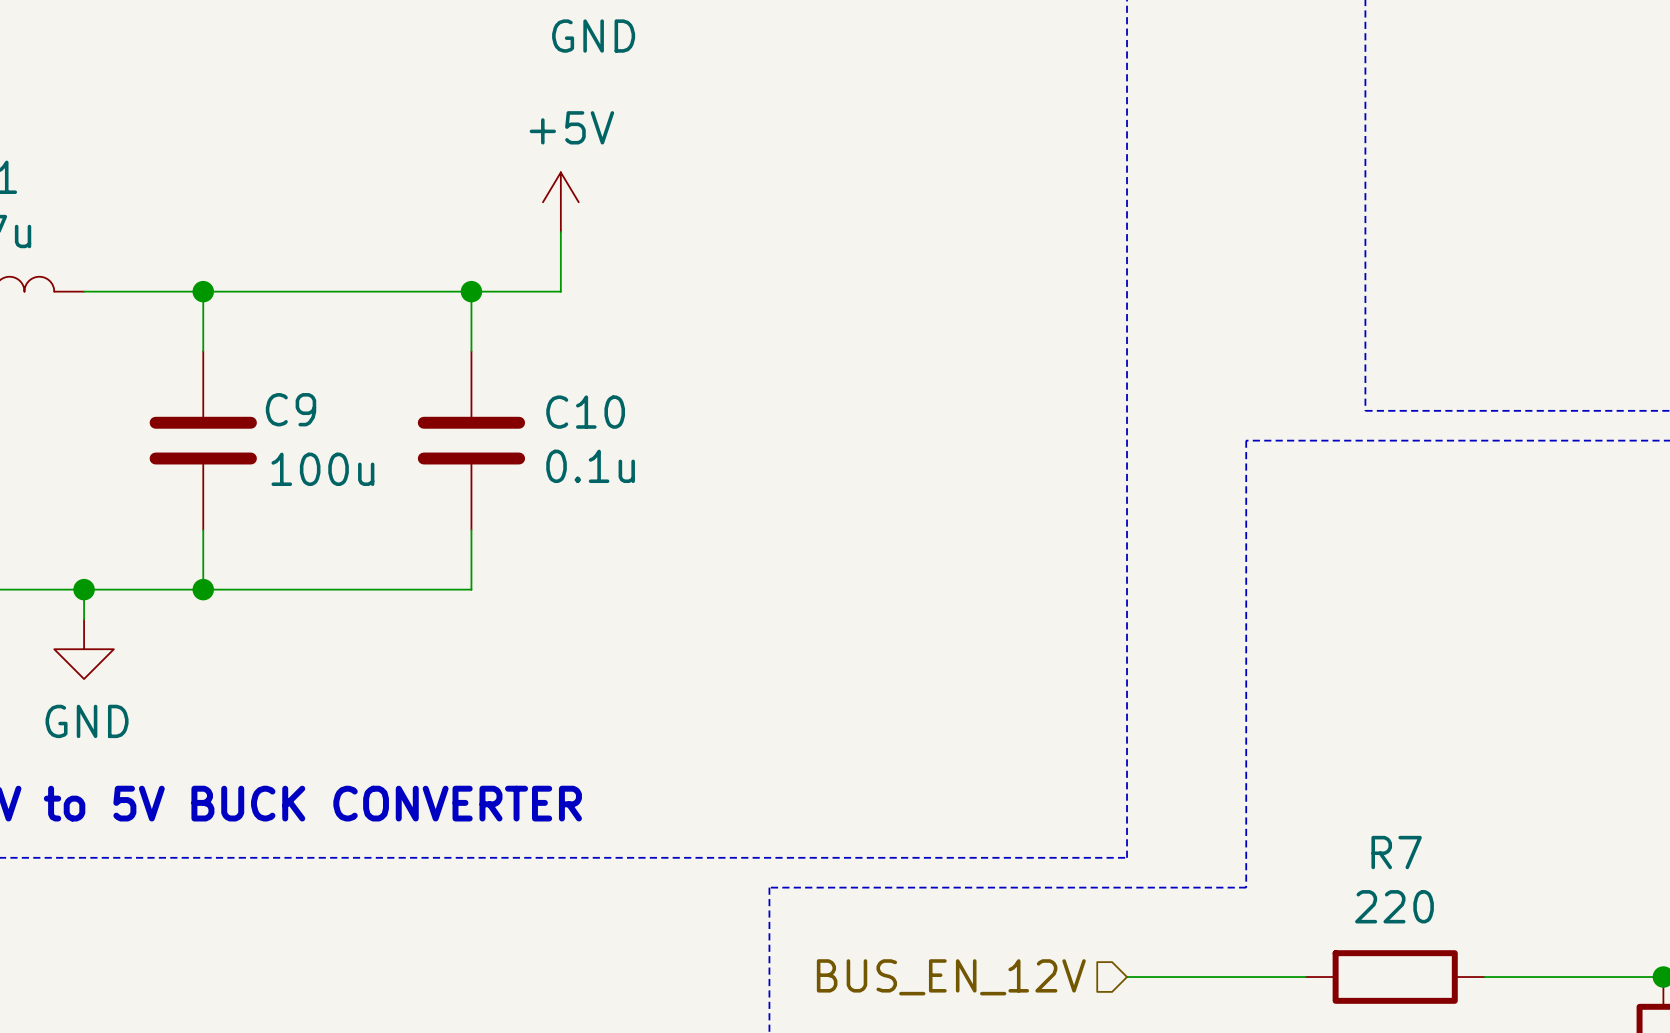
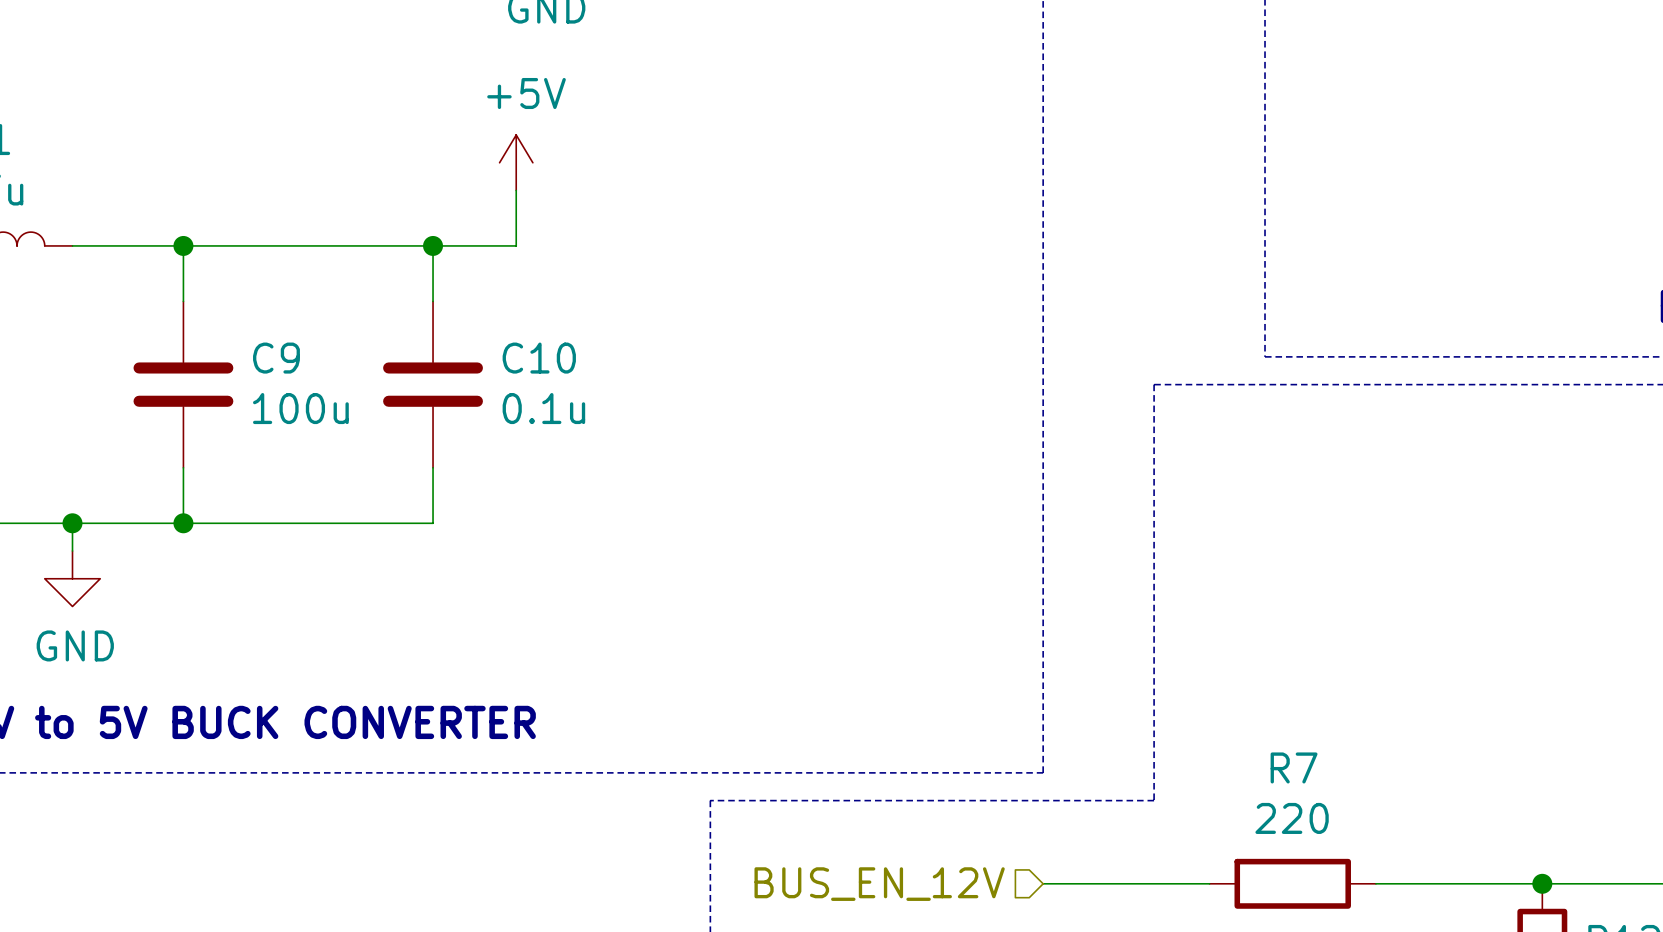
C9 name position: C9 (291, 409) -> C9 (276, 358)
C9 value position: 100u (322, 469) -> 100u (300, 408)

